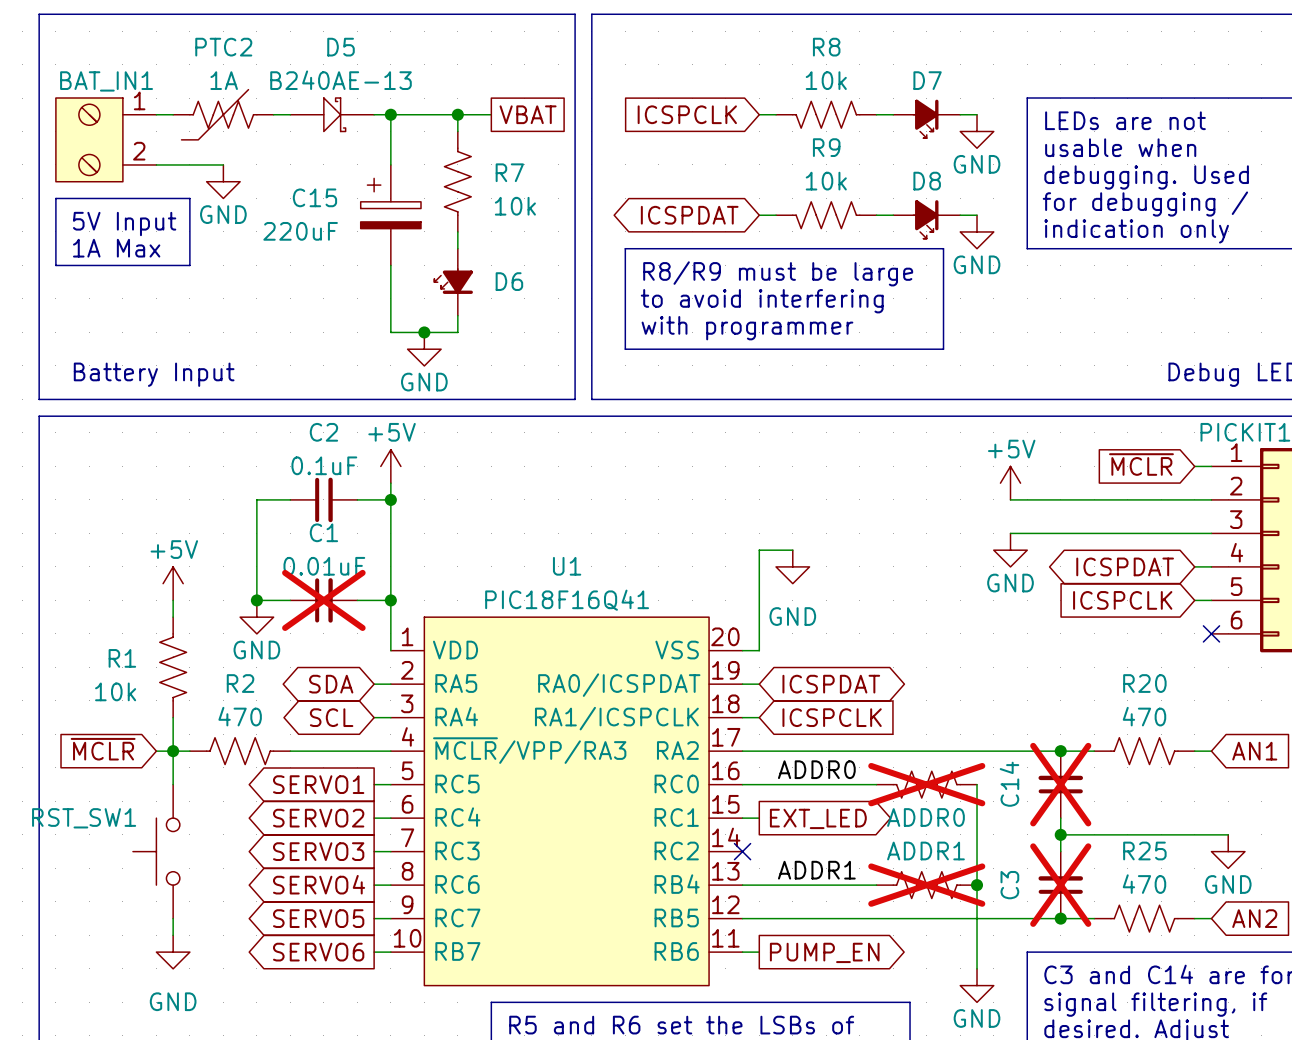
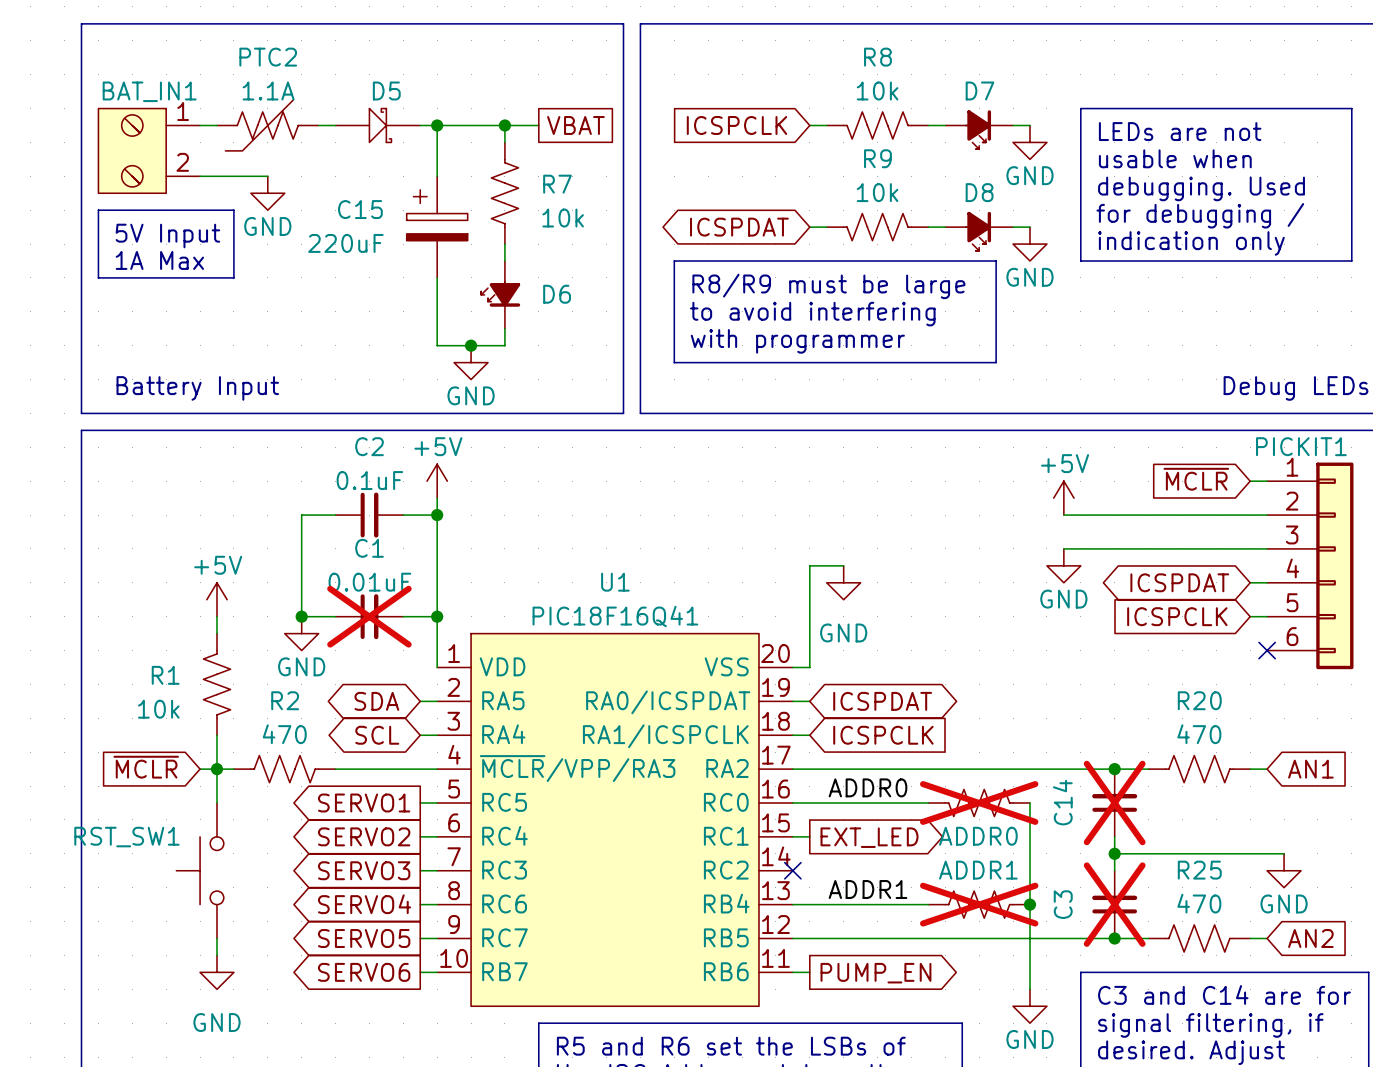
D5 name position: D5 (341, 47) -> D5 (386, 90)
PTC2 value: 1A (224, 80) -> 1.1A (268, 90)
D5 value: B240AE-13 (341, 80) -> none

